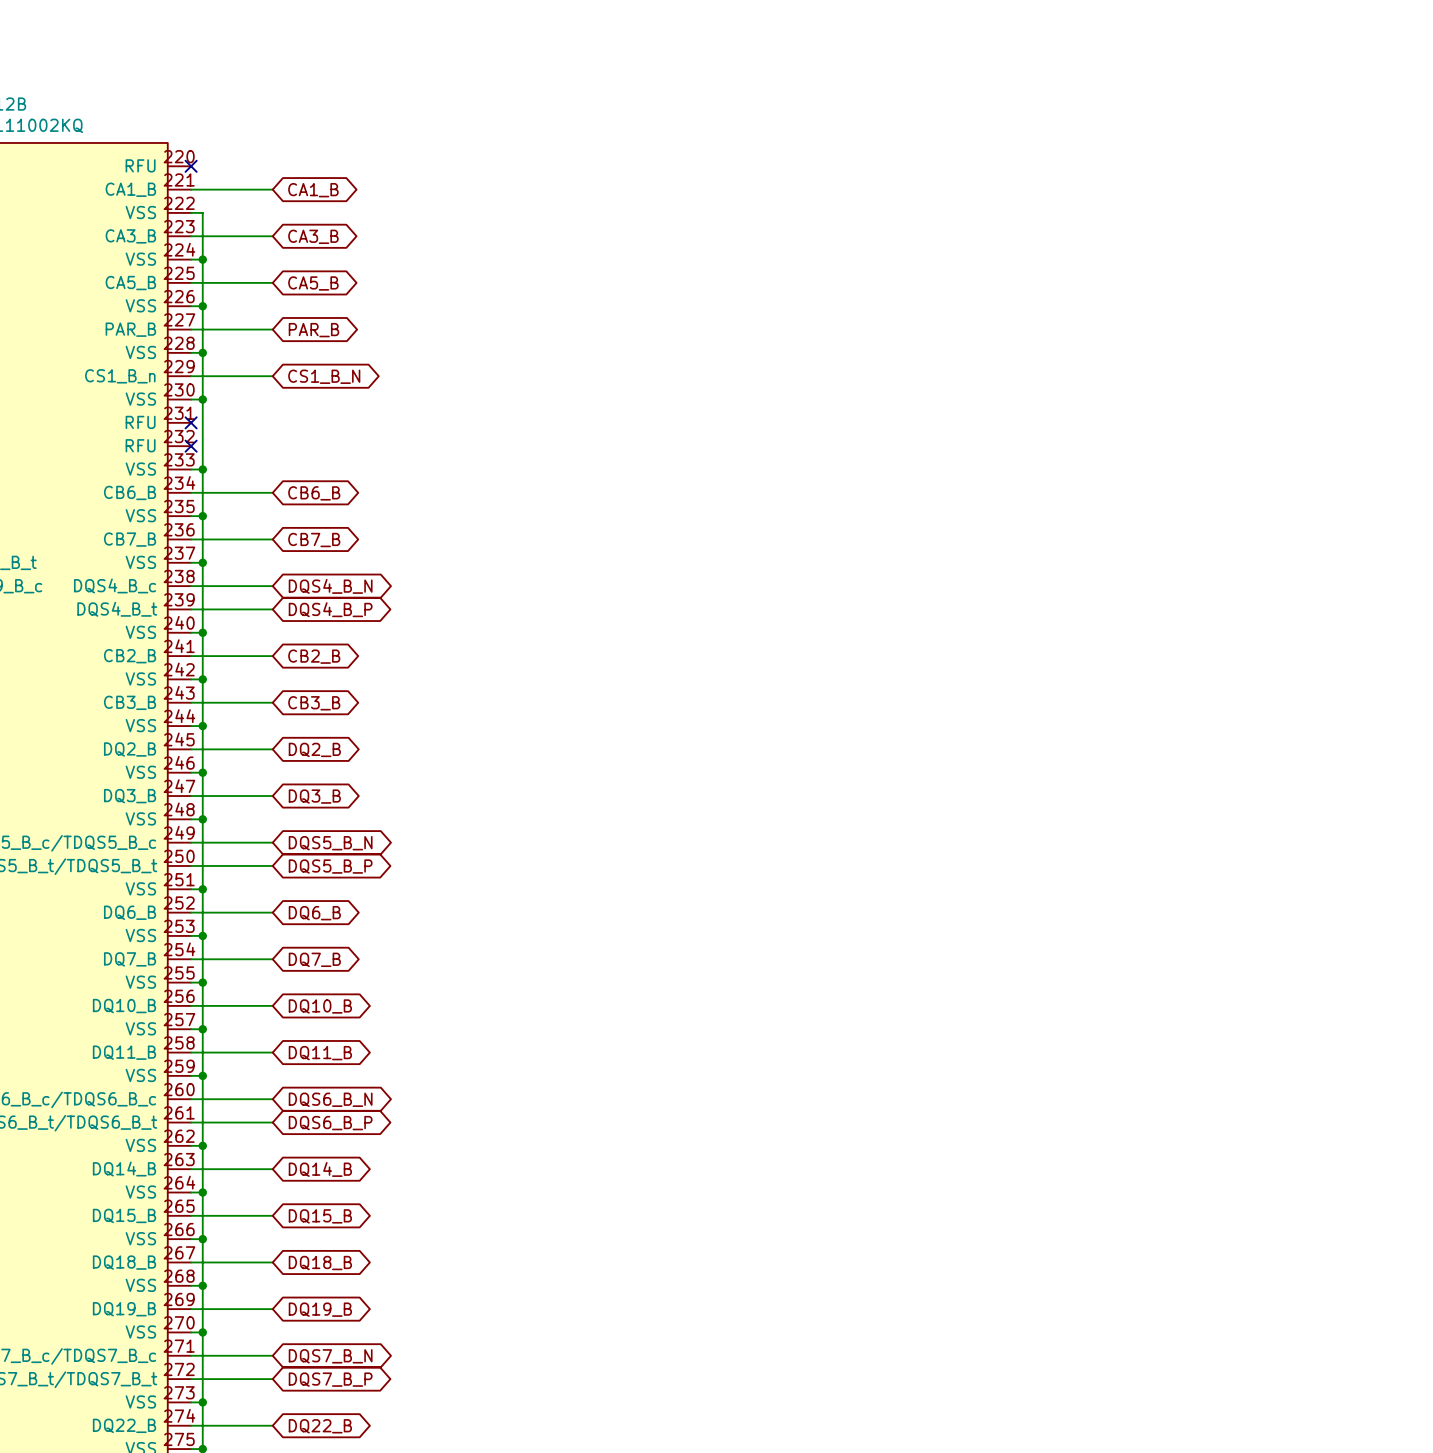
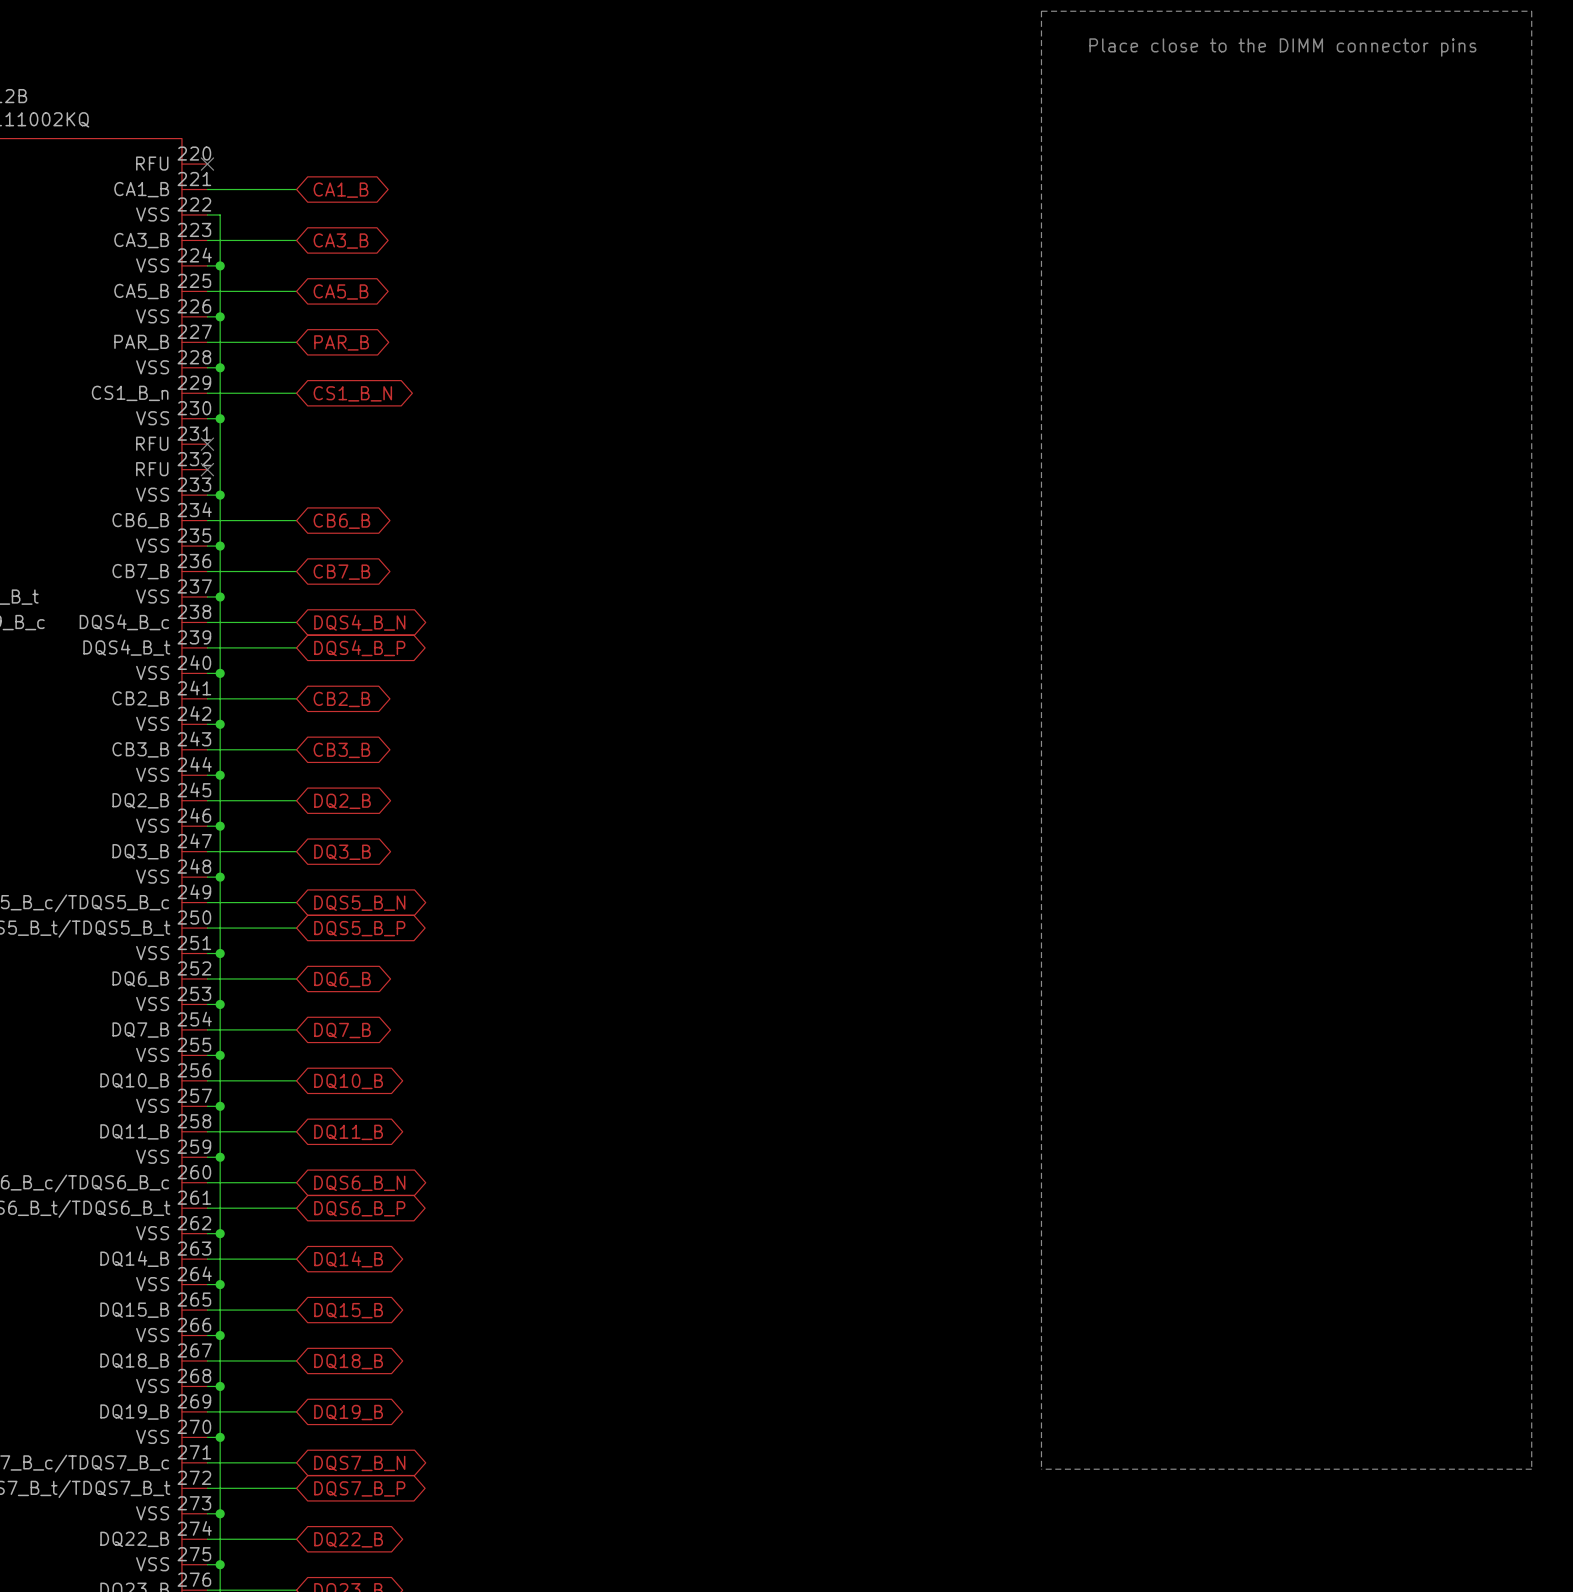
line: none -> (1041, 11) (1531, 11) (1531, 1469) (1041, 1469) (1041, 11)
text: none -> Place close to the DIMM connector pins (1282, 47)

